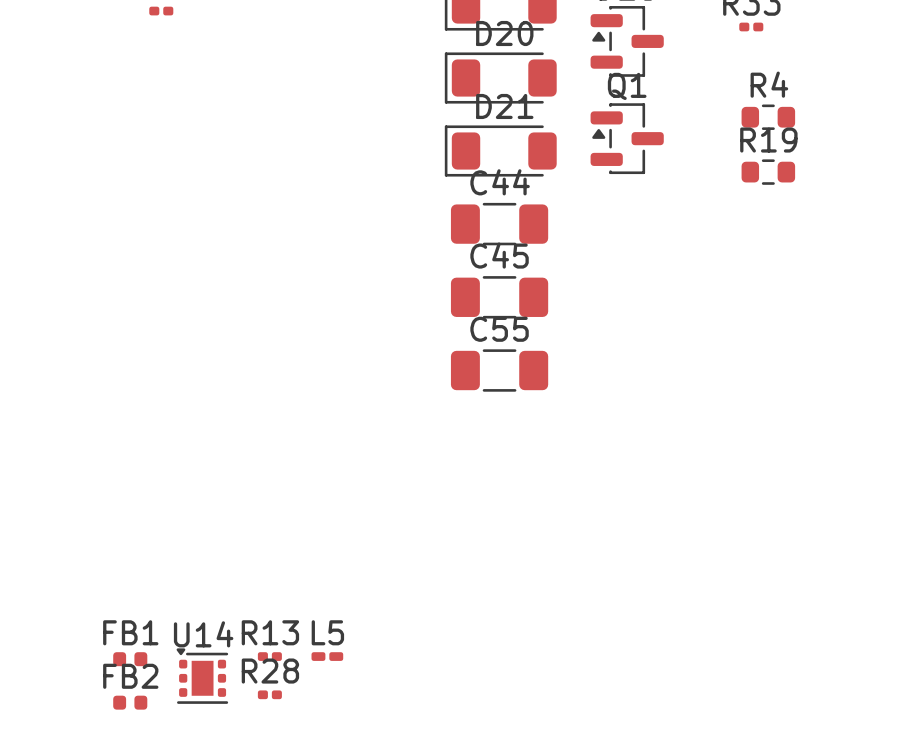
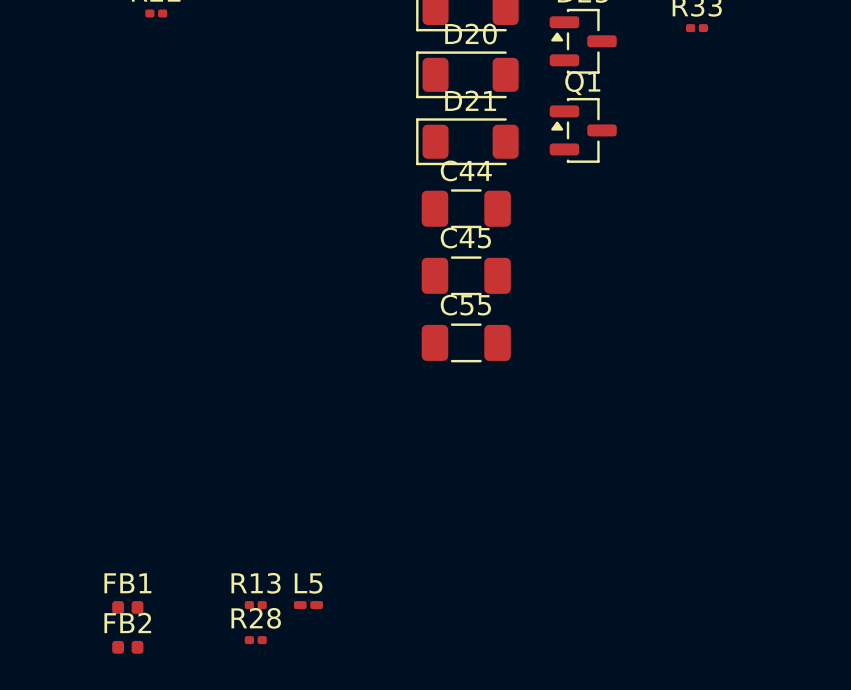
R4: (768, 117) -> none
R19: (768, 172) -> none
U14: (202, 676) -> none

